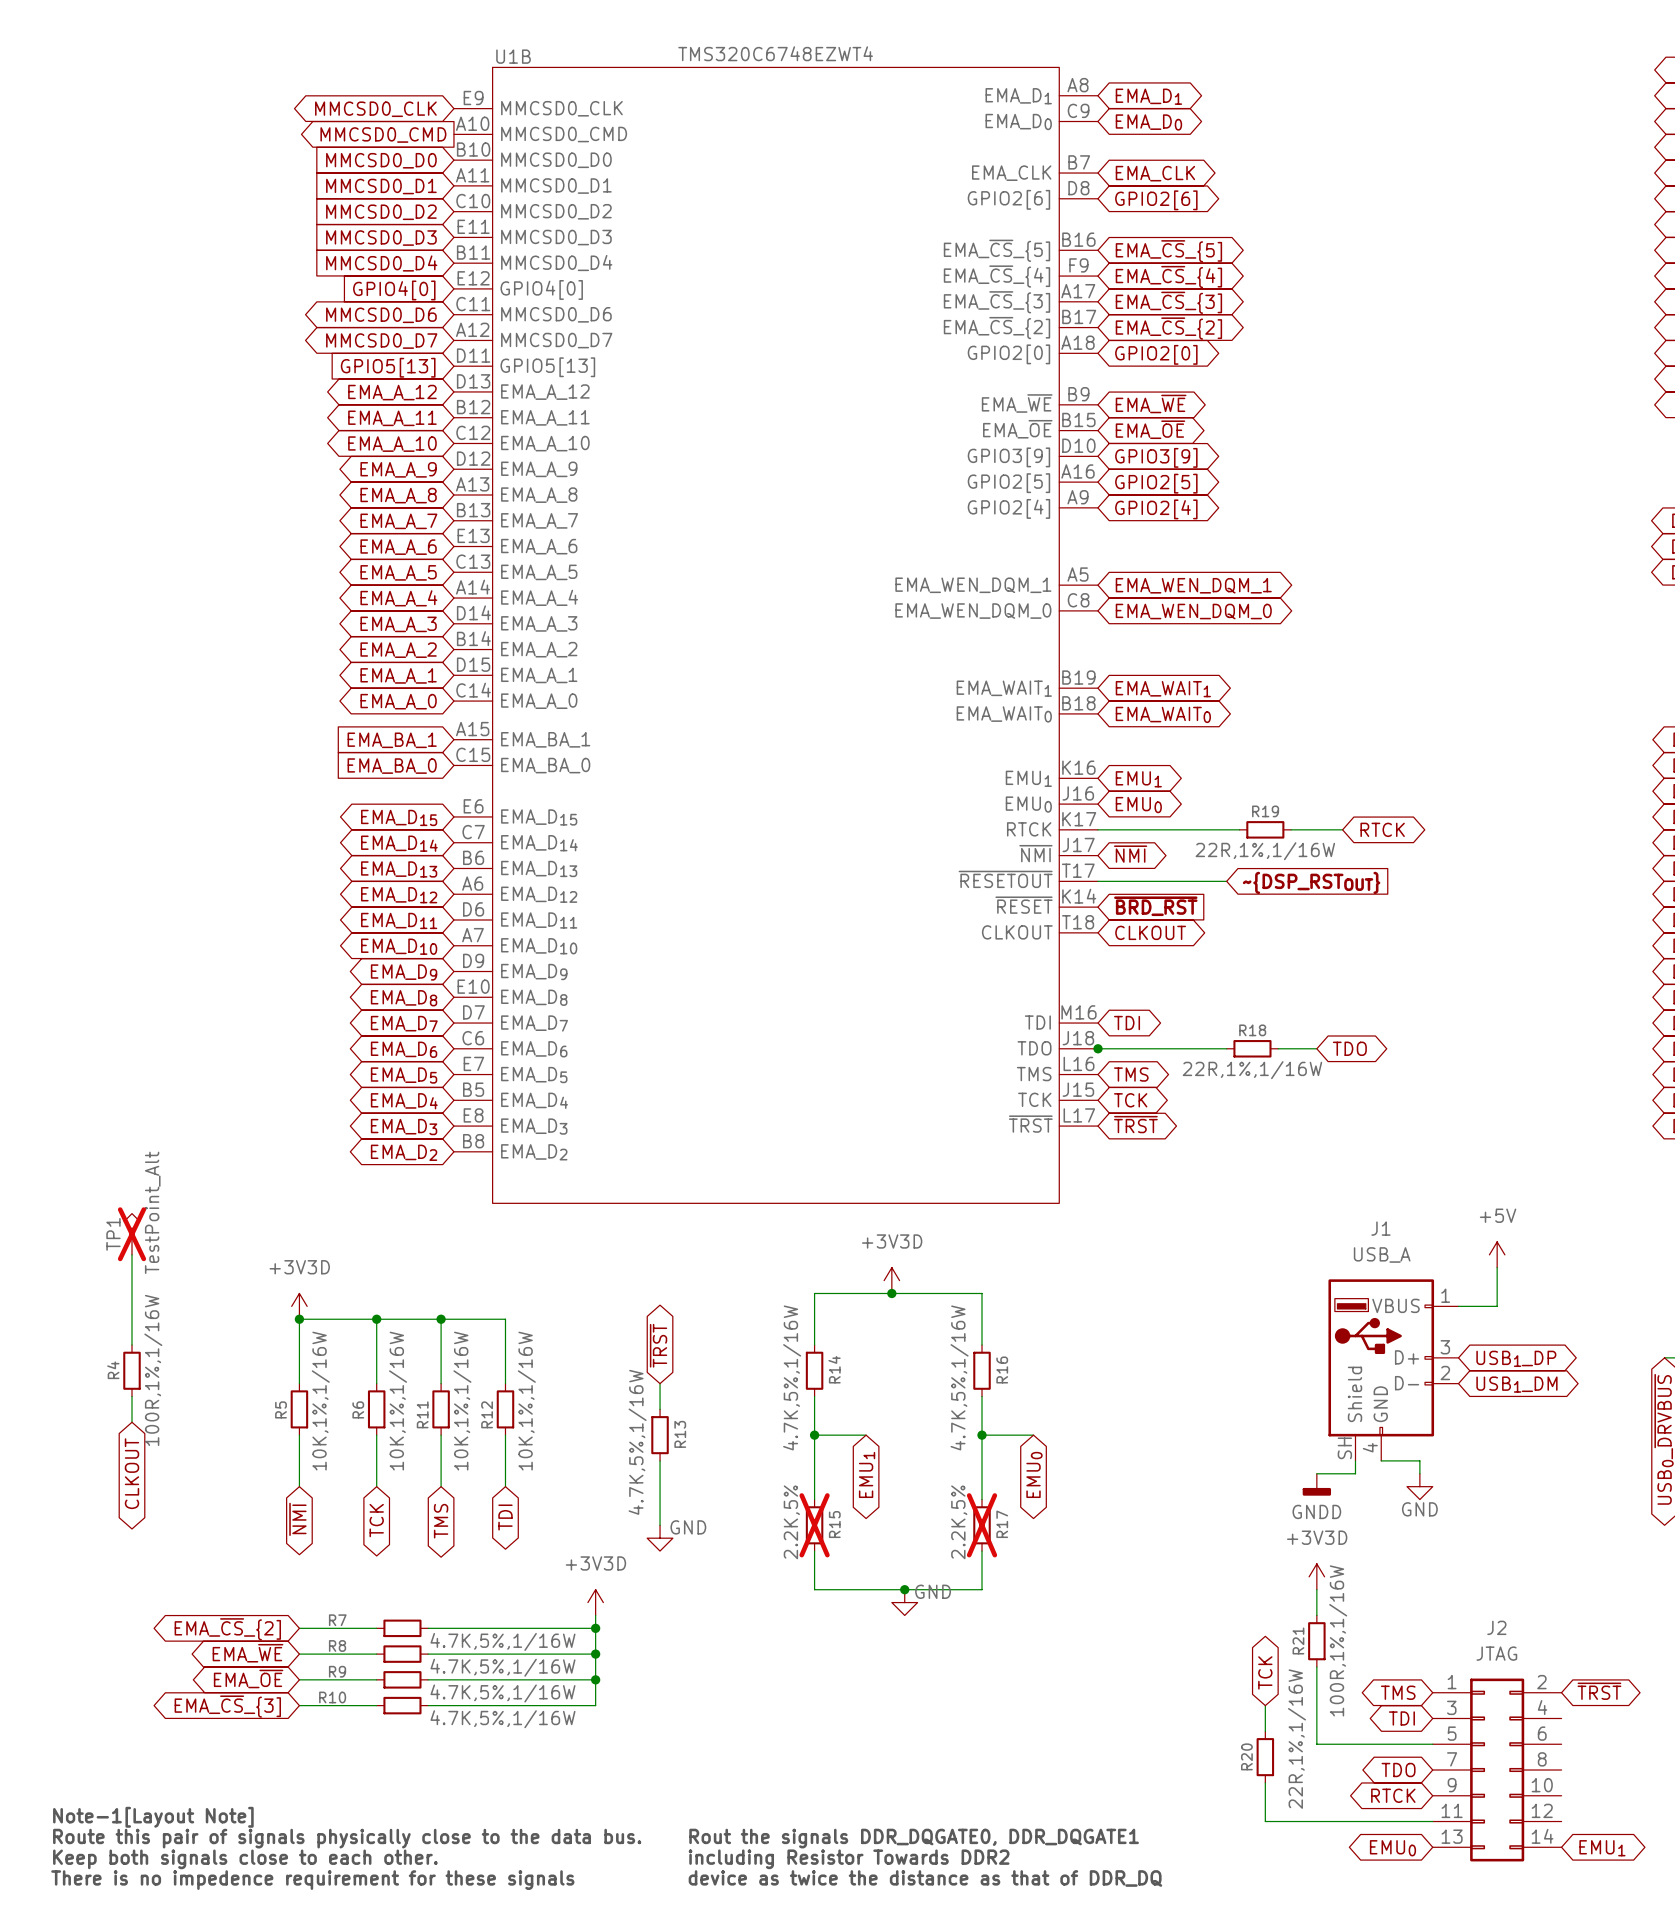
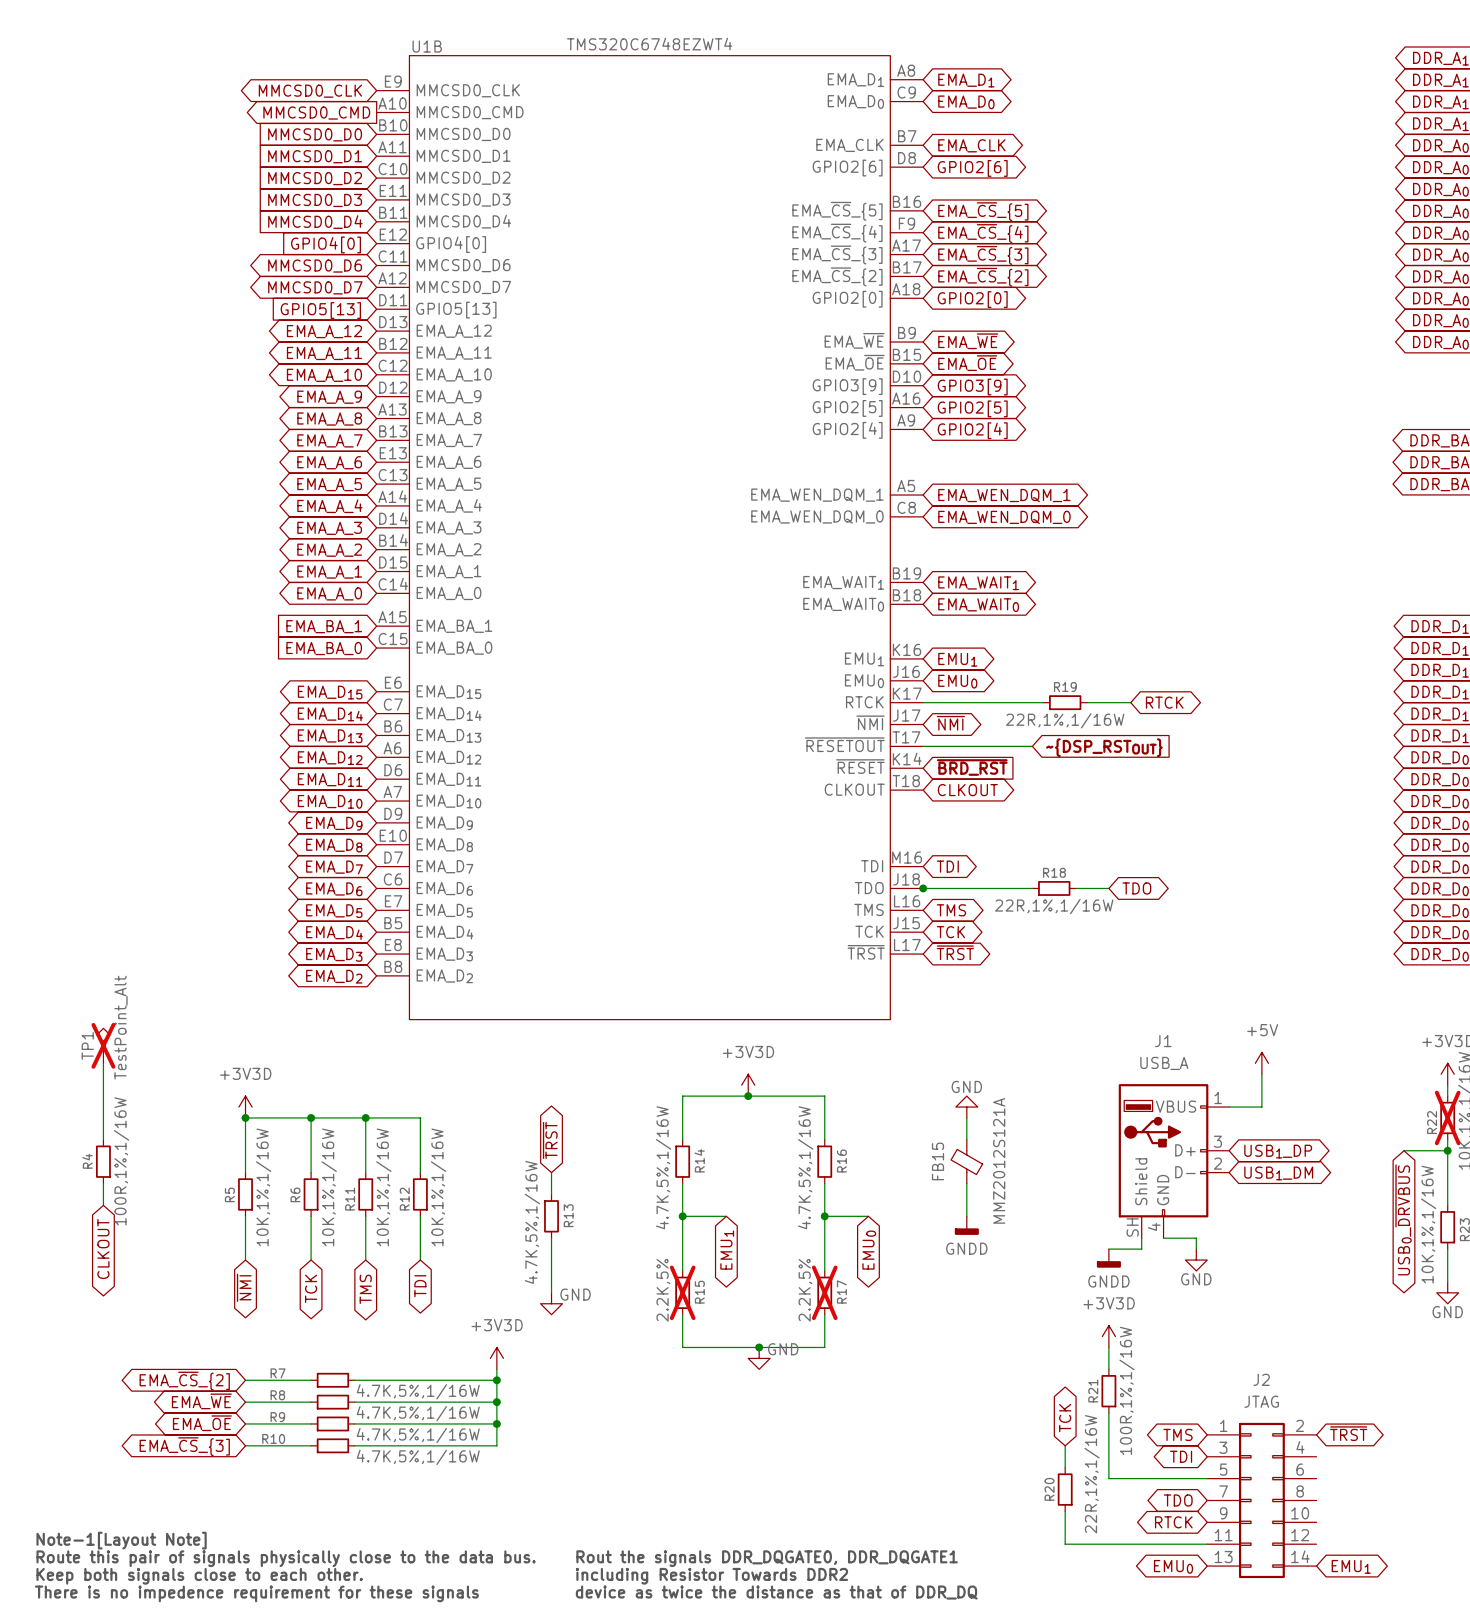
power symbol: none -> GND (966, 1107)
wire: none -> (966, 1117) (966, 1139)
FB15: none -> MMZ2012S121A (966, 1161)
wire: none -> (966, 1183) (966, 1216)
power symbol: none -> GNDD (966, 1225)

